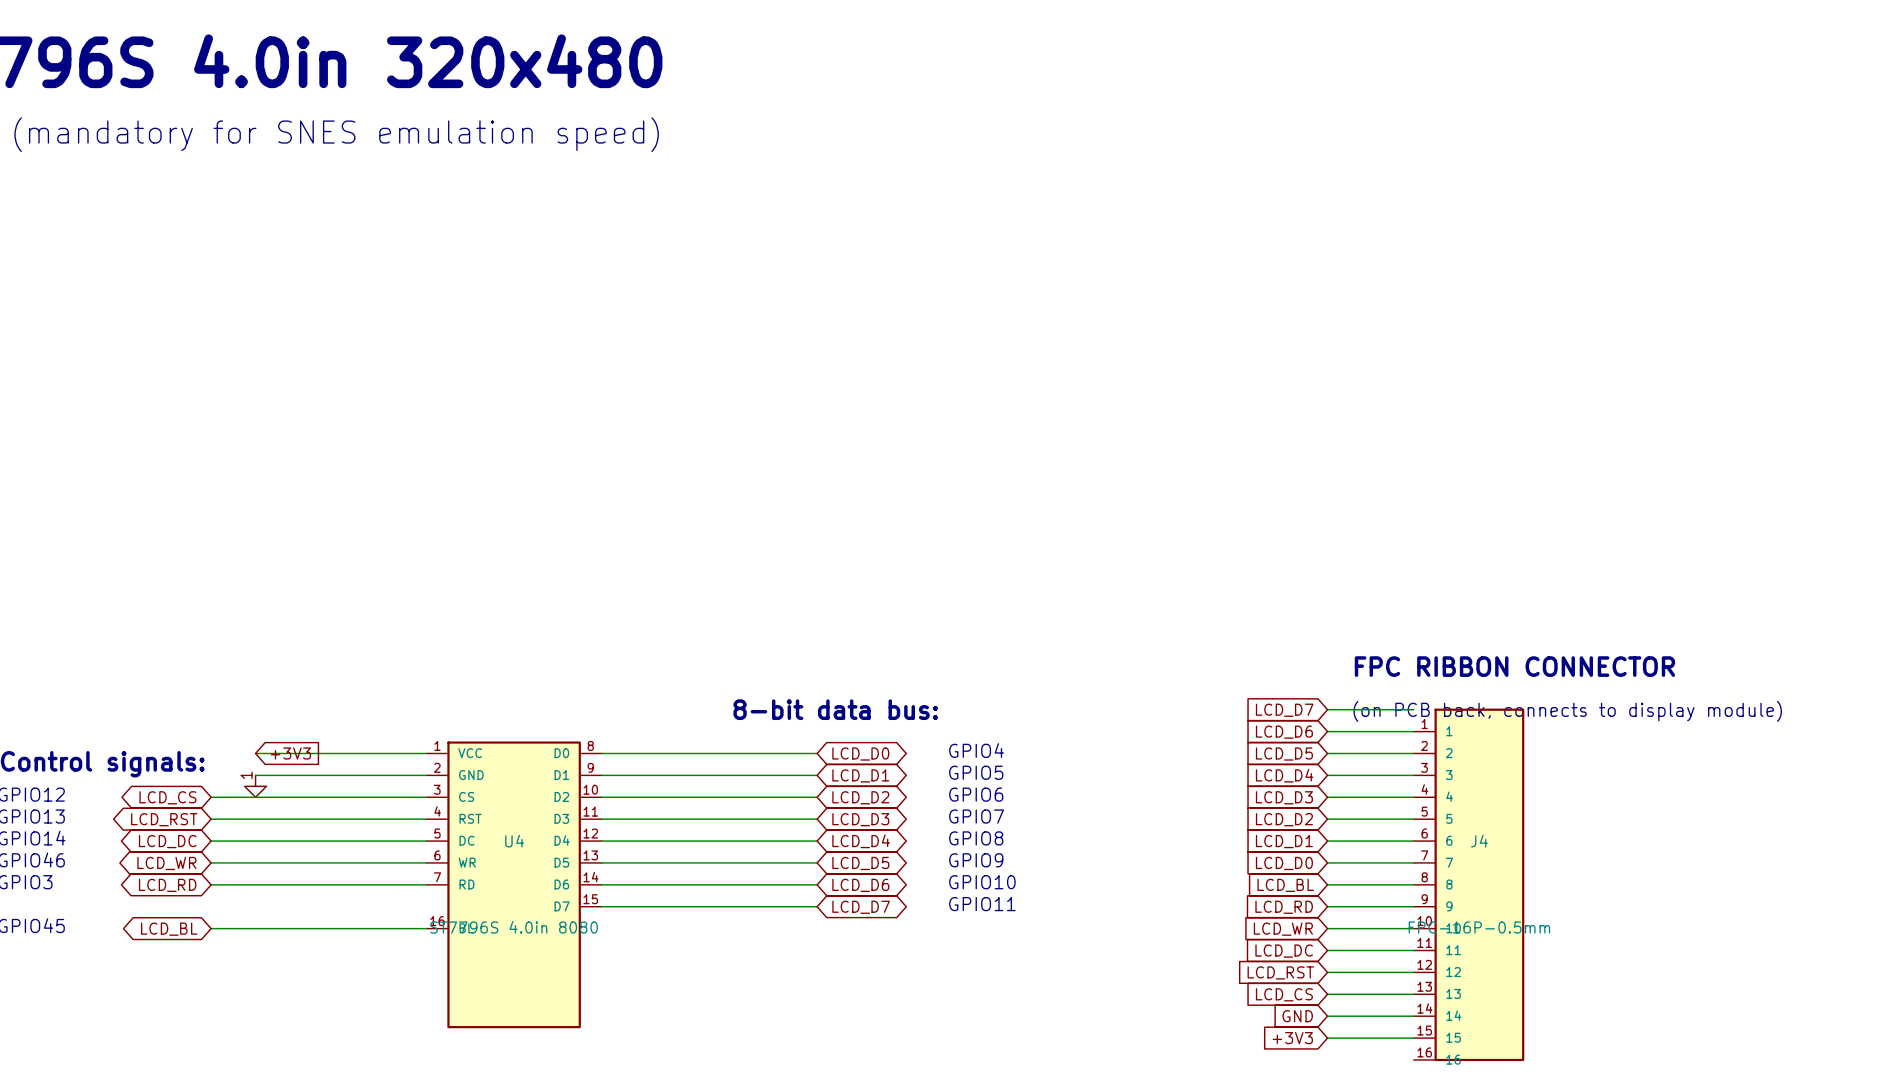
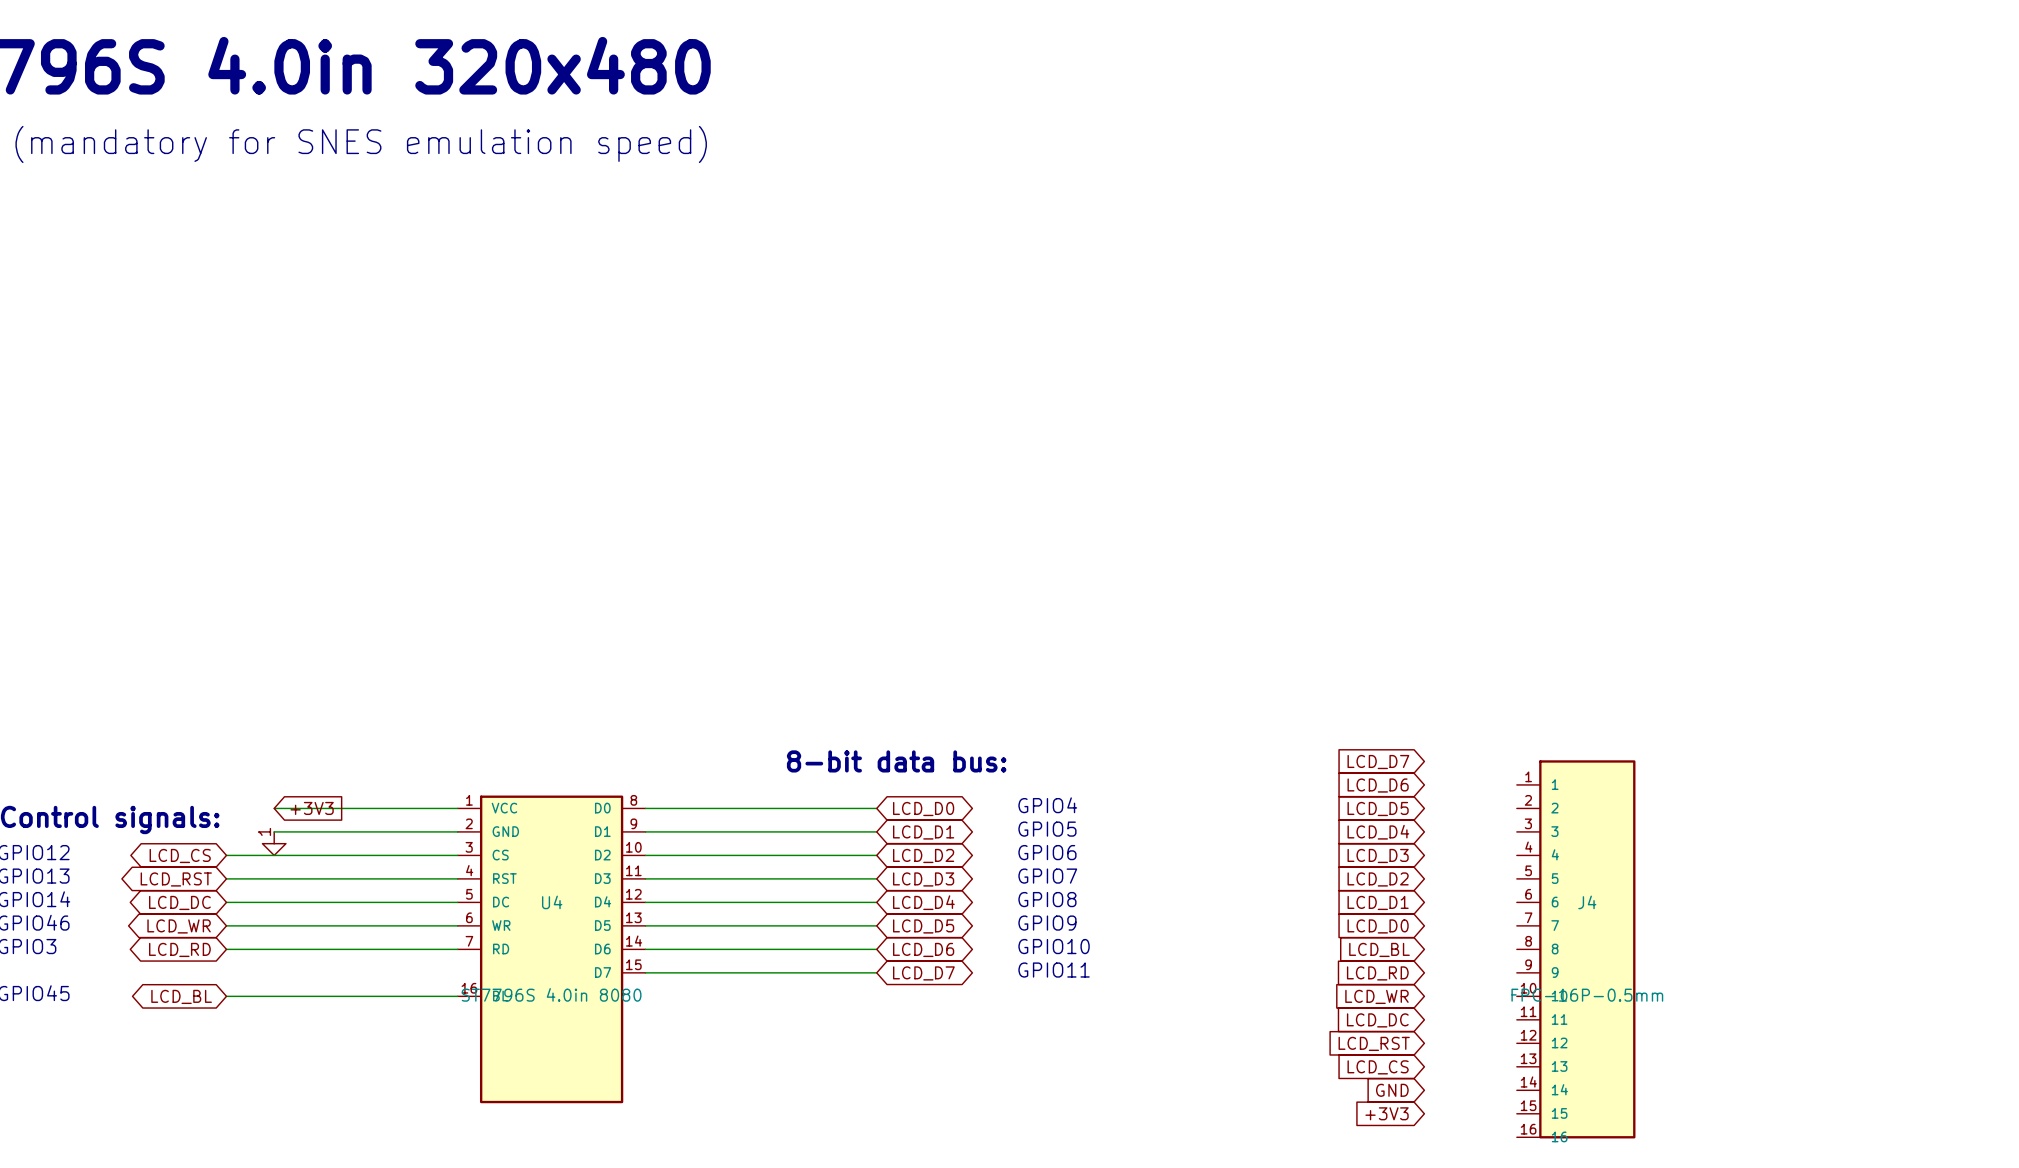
text: FPC RIBBON CONNECTOR (1514, 666) -> none
wire: (1327, 709) (1413, 709) -> none
text: (on PCB back, connects to display module) (1567, 711) -> none
wire: (1327, 731) (1413, 731) -> none
wire: (1327, 753) (1413, 753) -> none
wire: (1327, 775) (1413, 775) -> none
wire: (1327, 797) (1413, 797) -> none
wire: (1327, 819) (1413, 819) -> none
wire: (1327, 841) (1413, 841) -> none
wire: (1327, 862) (1413, 862) -> none
wire: (1327, 884) (1413, 884) -> none
wire: (1327, 906) (1413, 906) -> none
wire: (1327, 928) (1413, 928) -> none
wire: (1327, 950) (1413, 950) -> none
wire: (1327, 972) (1413, 972) -> none
wire: (1327, 994) (1413, 994) -> none
wire: (1327, 1016) (1413, 1016) -> none
wire: (1327, 1038) (1413, 1038) -> none

